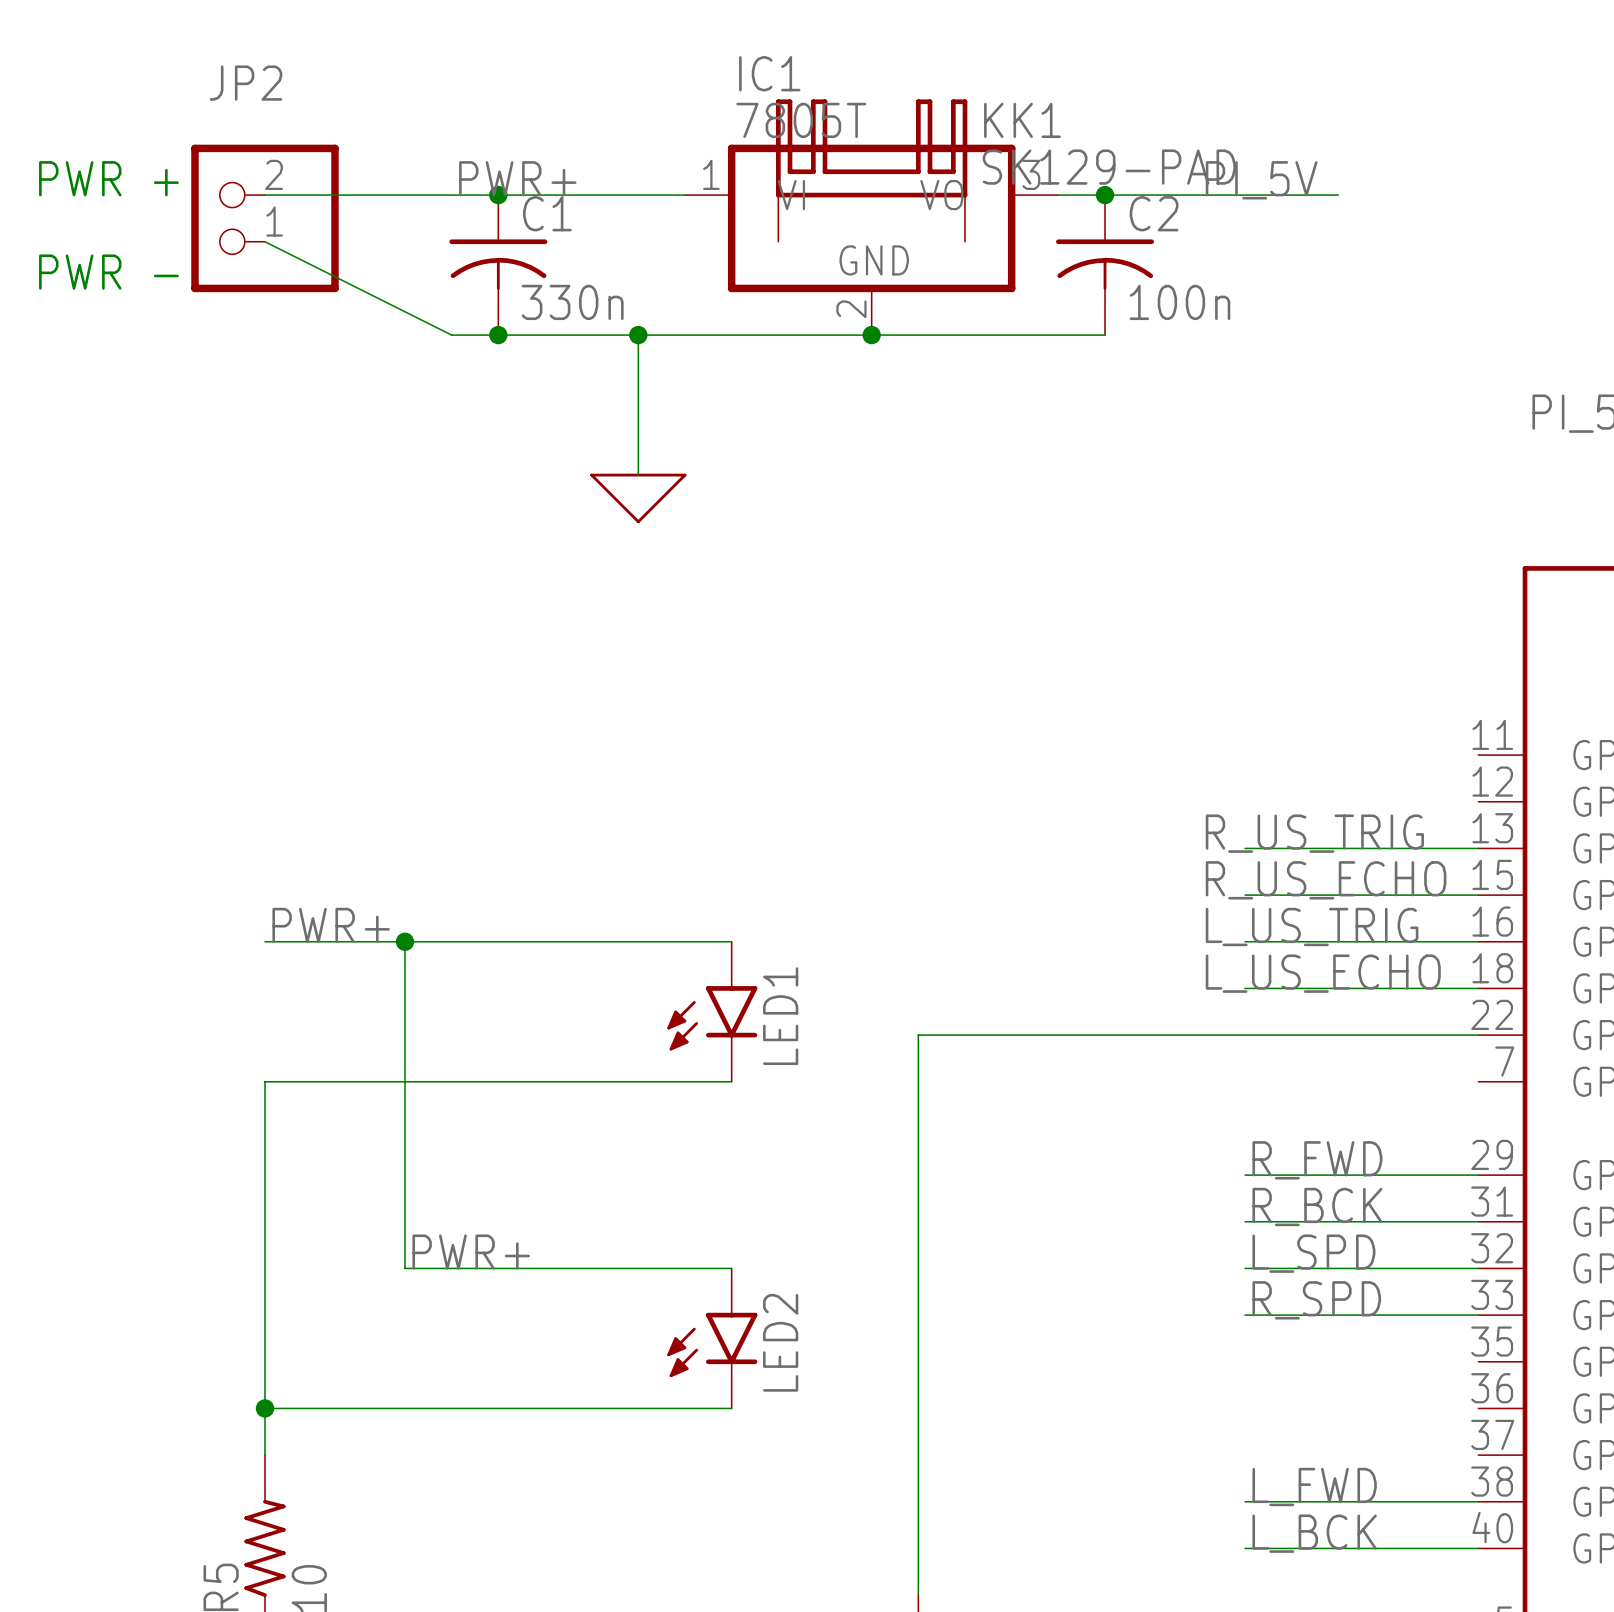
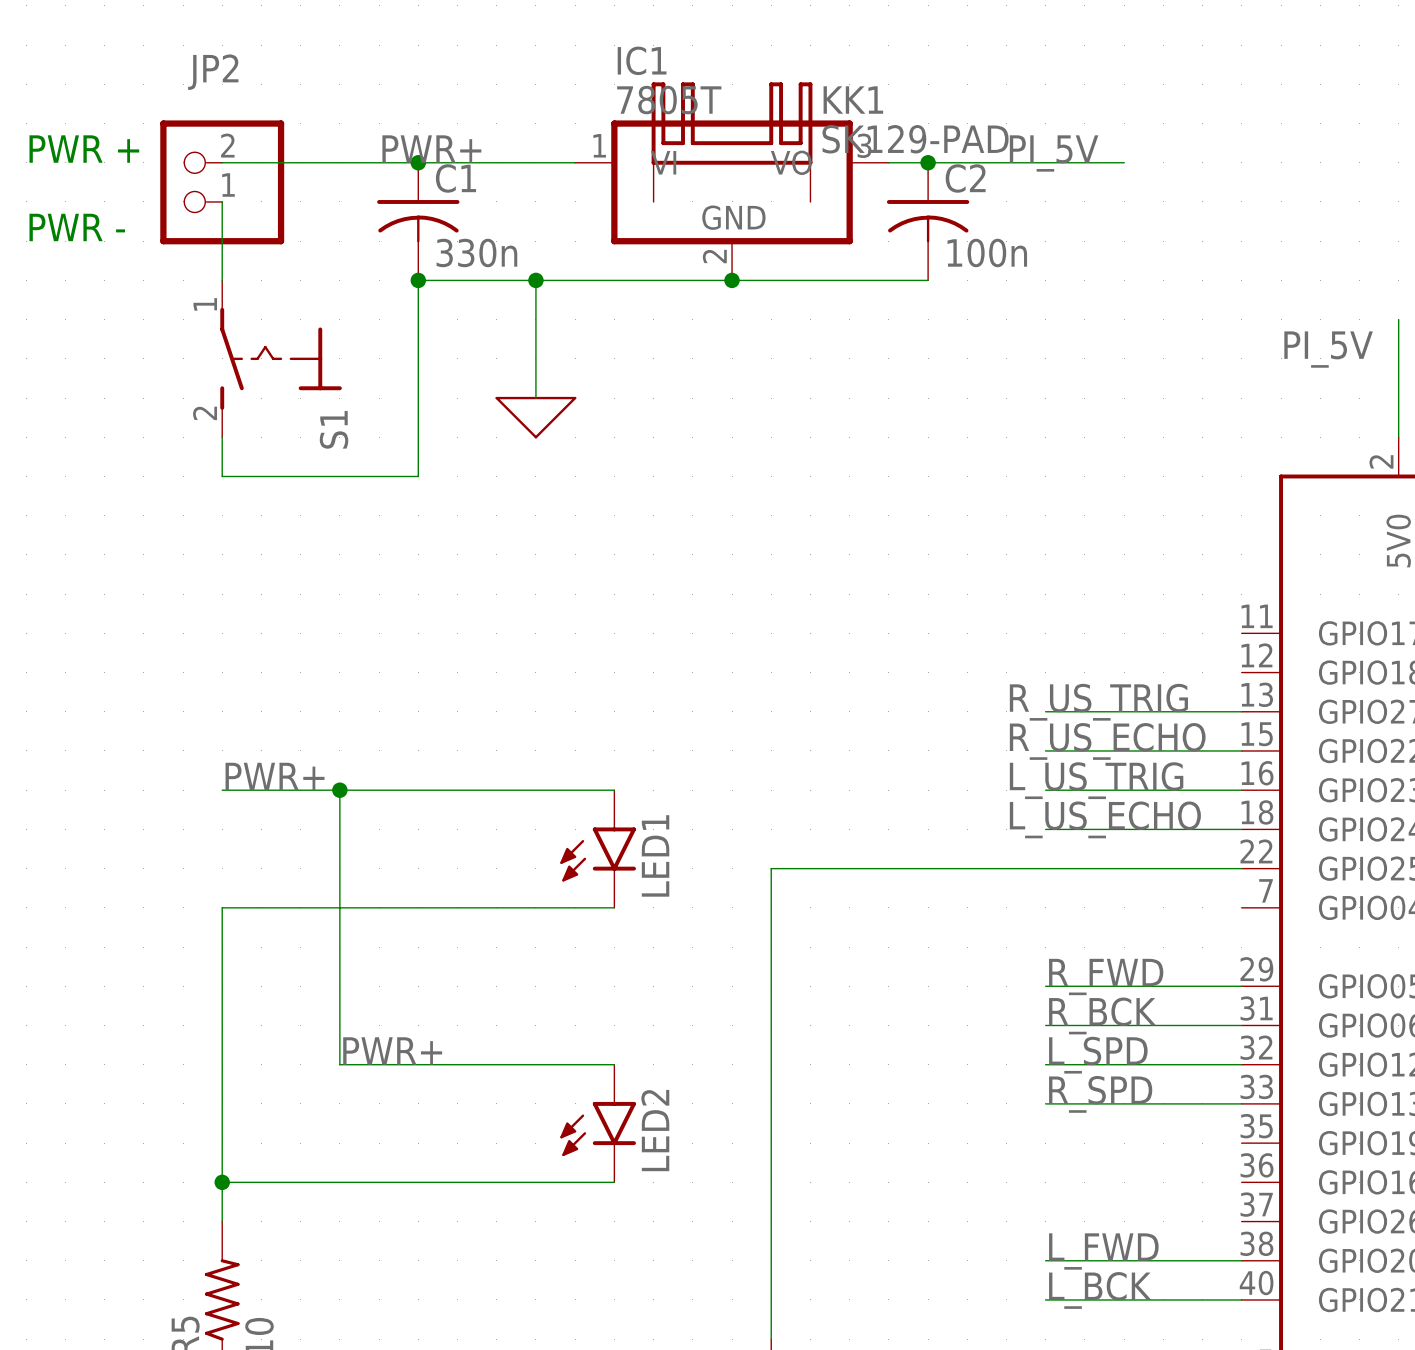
wire: (264, 241) (451, 335) (498, 335) -> (222, 201) (222, 280)
wire: none -> (418, 280) (418, 476) (222, 476) (222, 437)
S1: none -> (281, 358)

